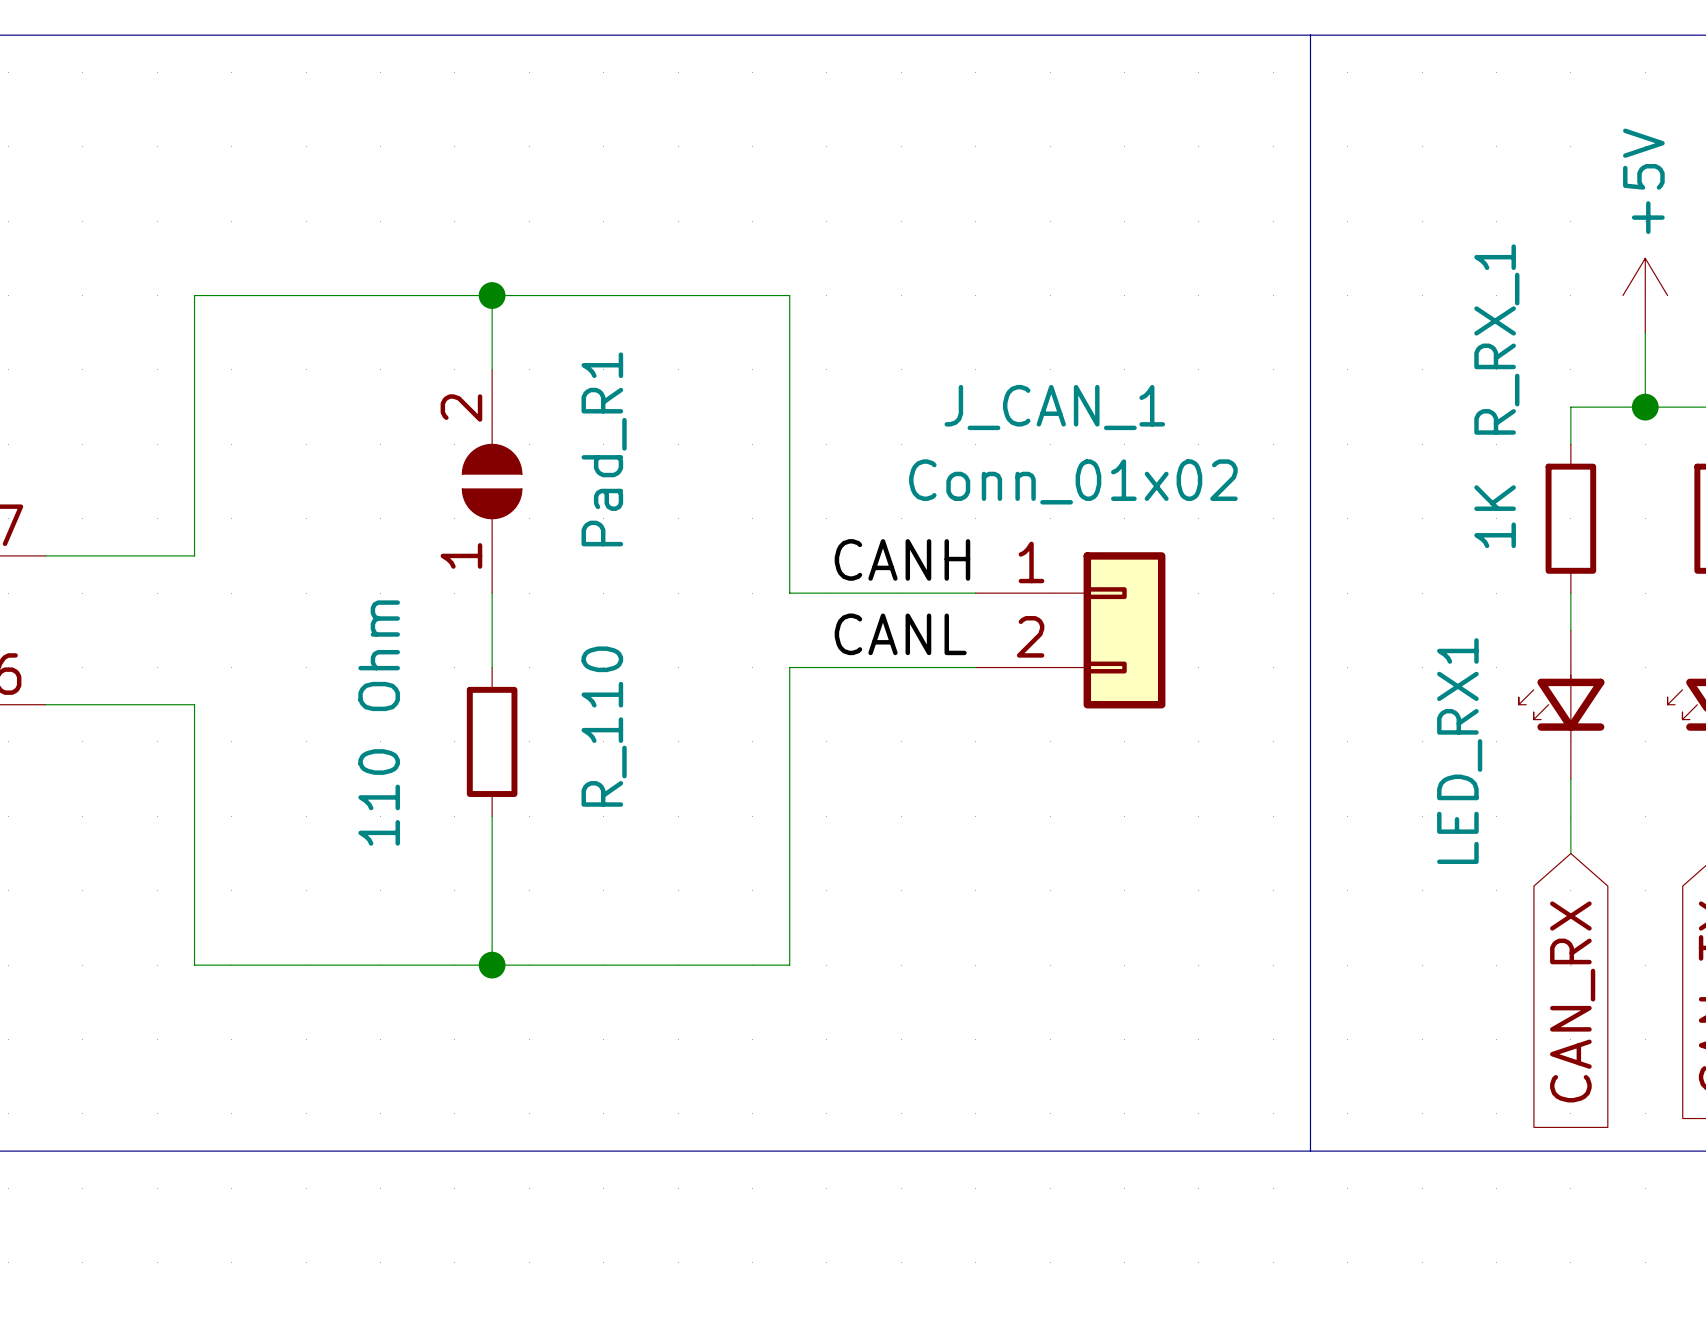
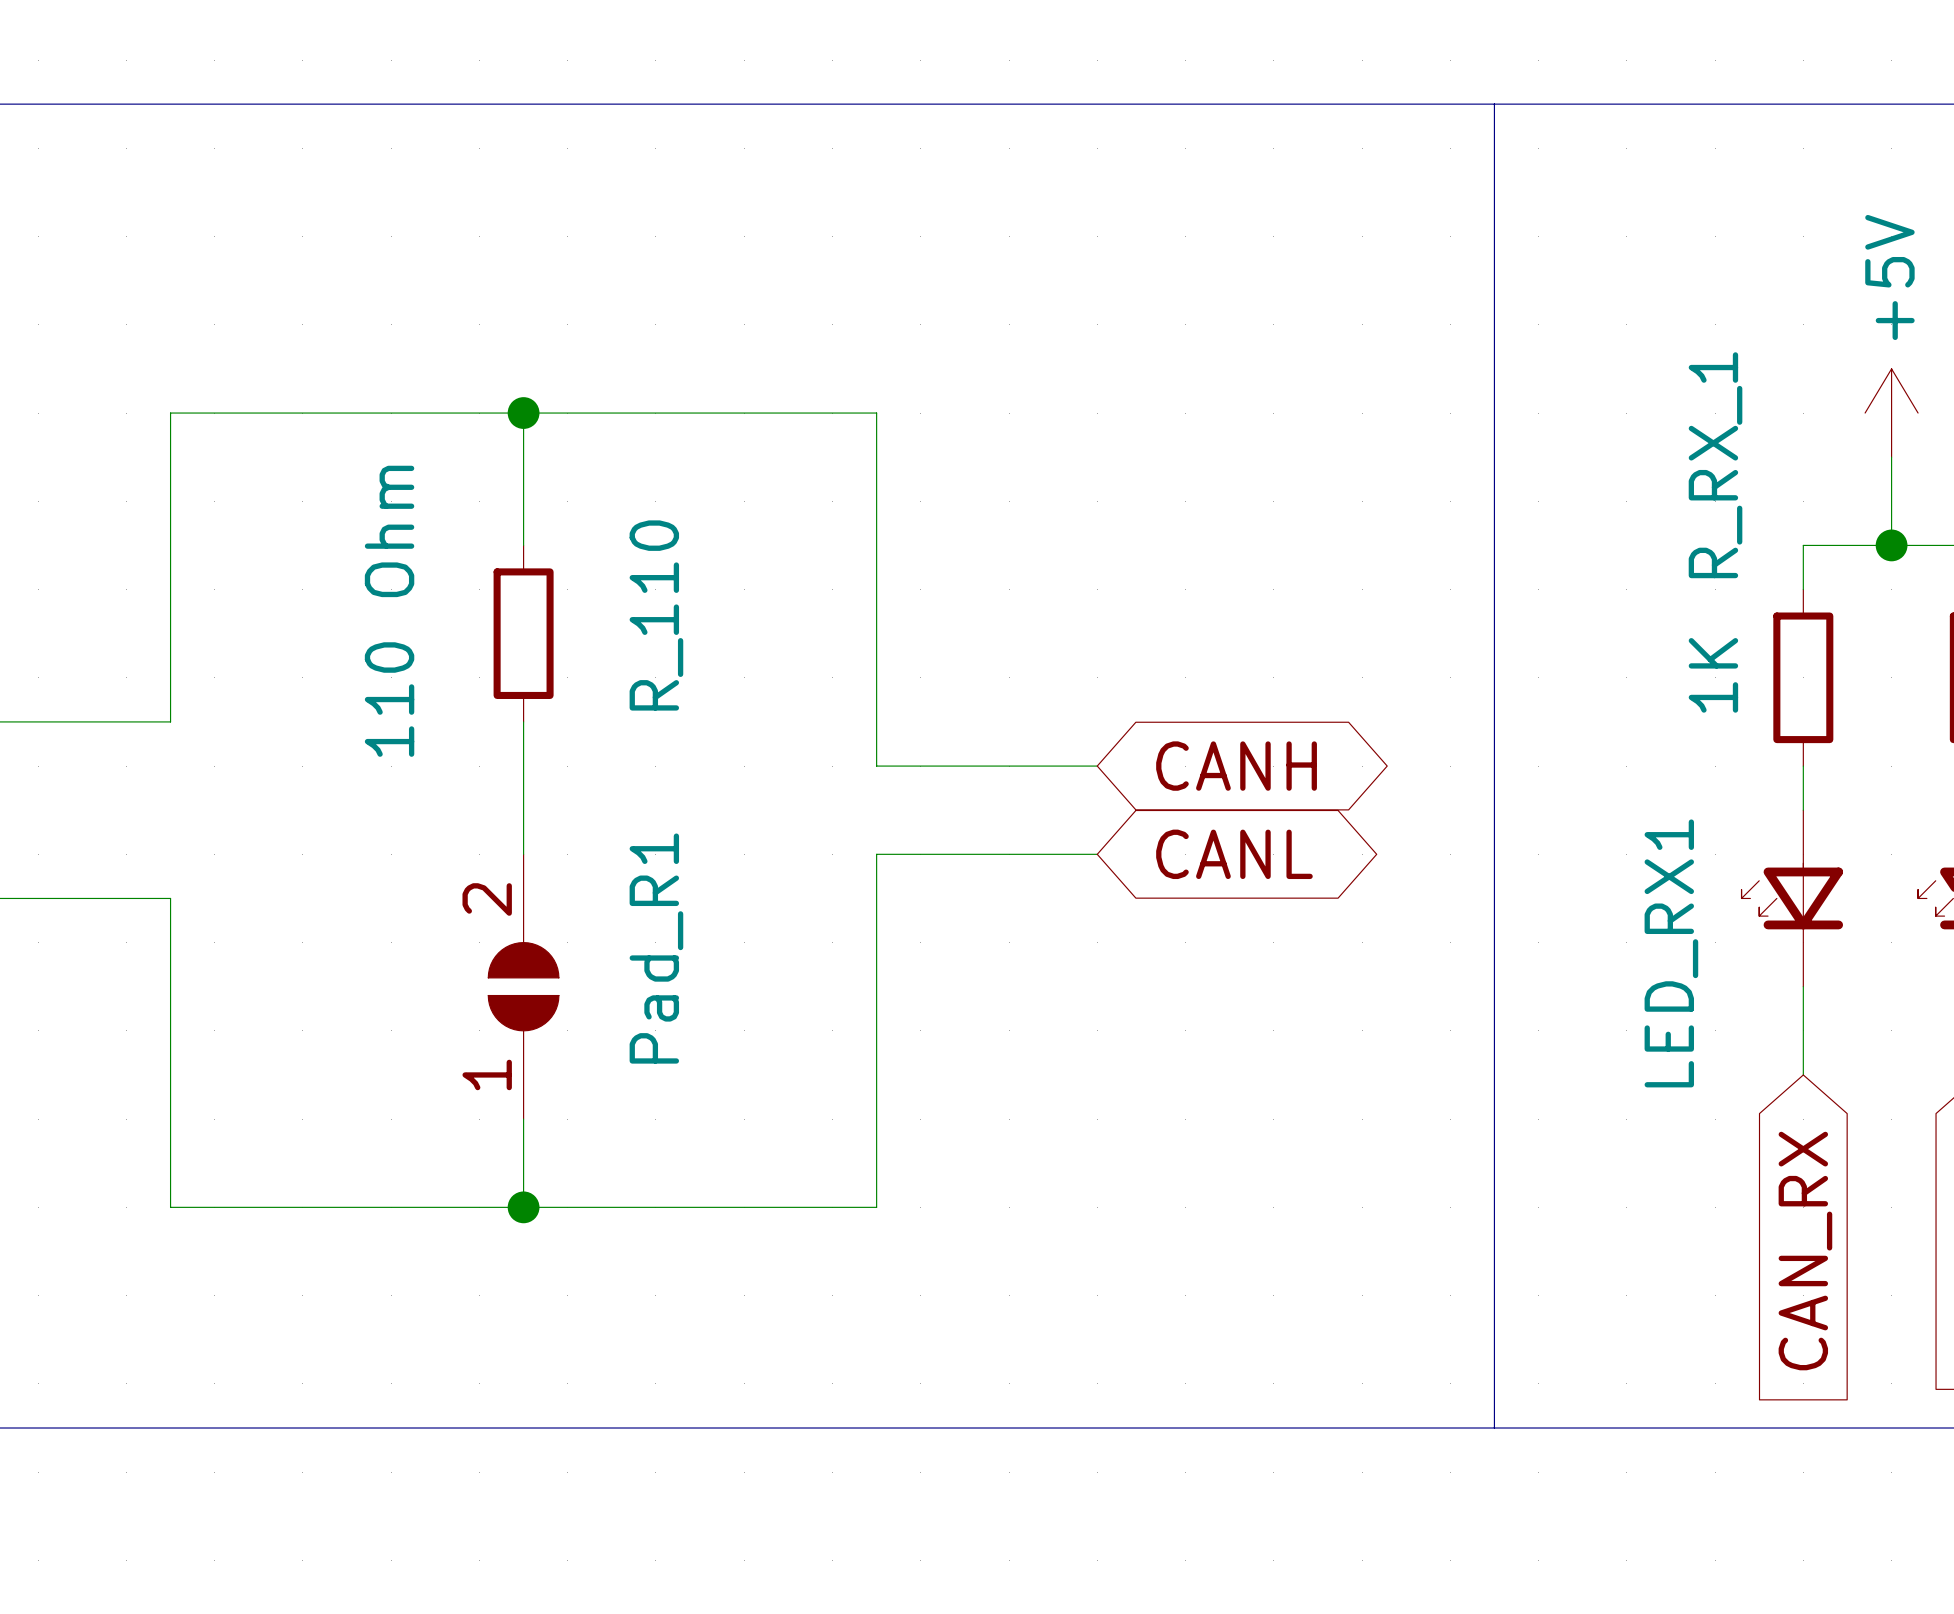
Pad_R1 position: (492, 481) -> (523, 986)
label: CANH (902, 559) -> none
global label: none -> CANH (1236, 766)
J_CAN_1: Conn_01x02 (1070, 630) -> none
label: CANL (900, 634) -> none
global label: none -> CANL (1234, 854)
R_110 position: (492, 741) -> (523, 633)

